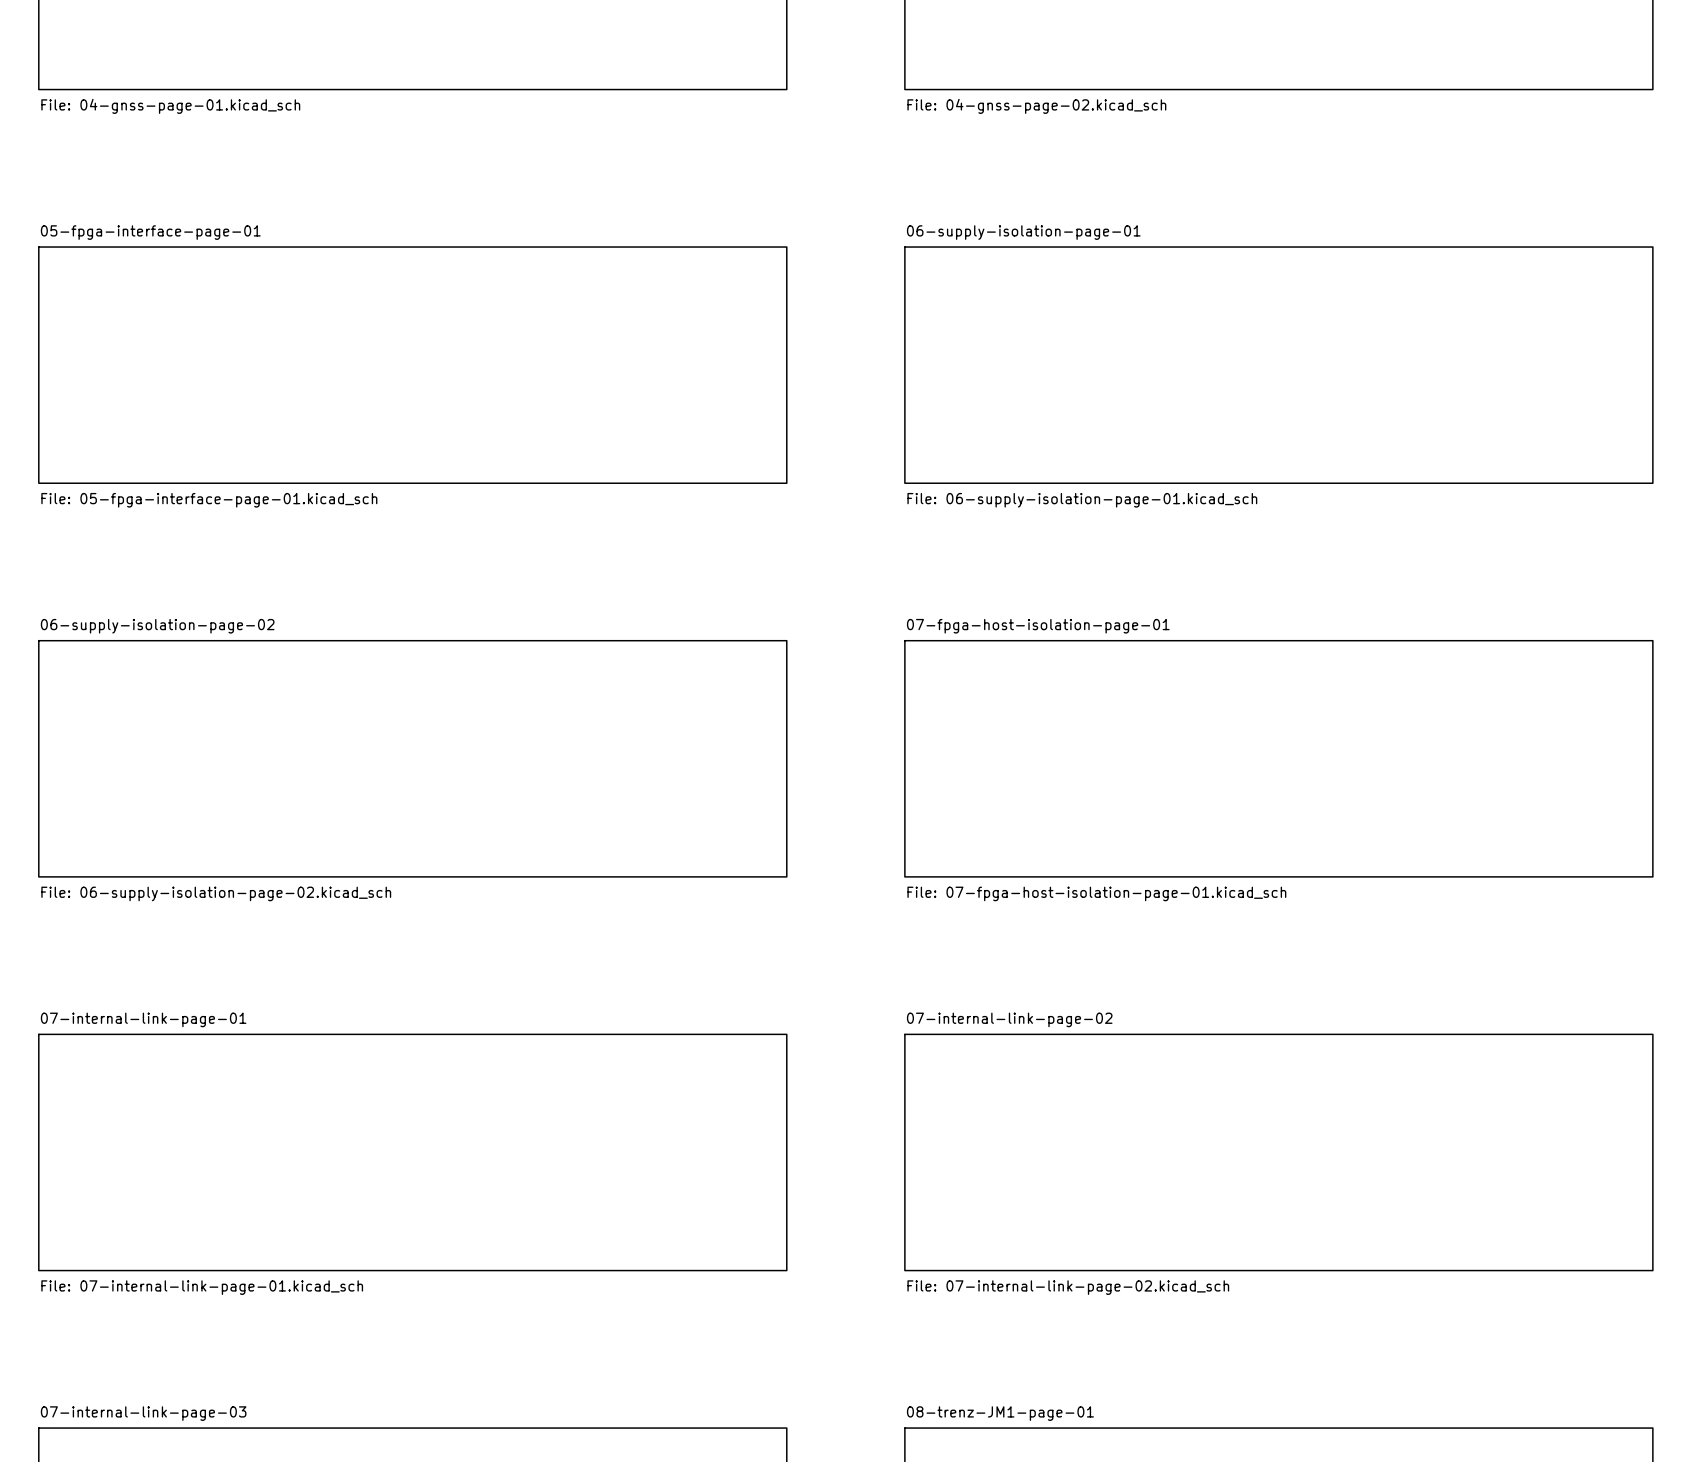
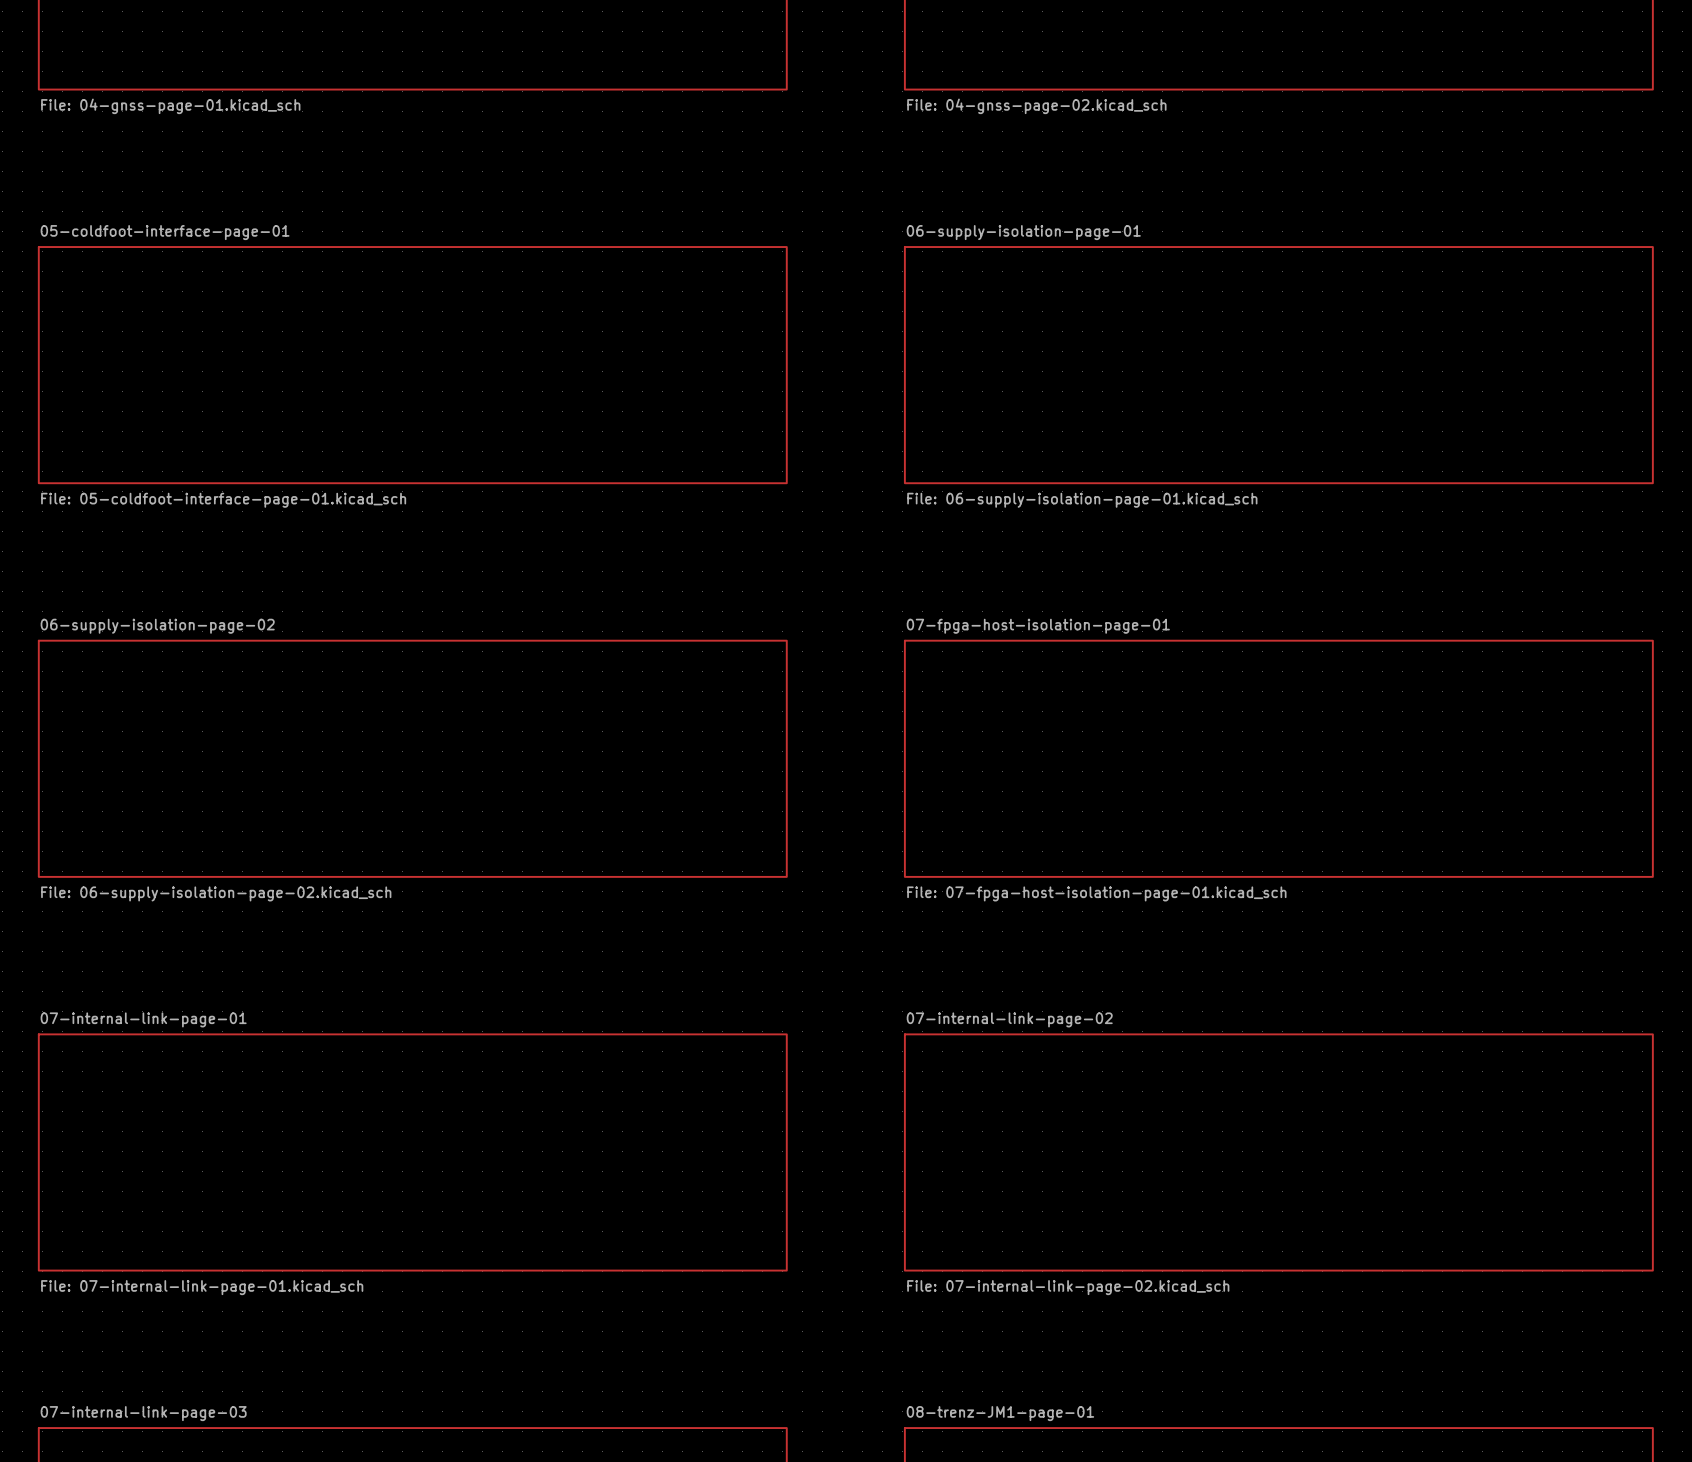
sheet 05-fpga-interface-page-01 name: 05-fpga-interface-page-01 (150, 232) -> 05-coldfoot-interface-page-01 (165, 232)
sheet 05-fpga-interface-page-01 value: File: 05-fpga-interface-page-01.kicad_sch (209, 500) -> File: 05-coldfoot-interface-page-01.kicad_sch (223, 500)

